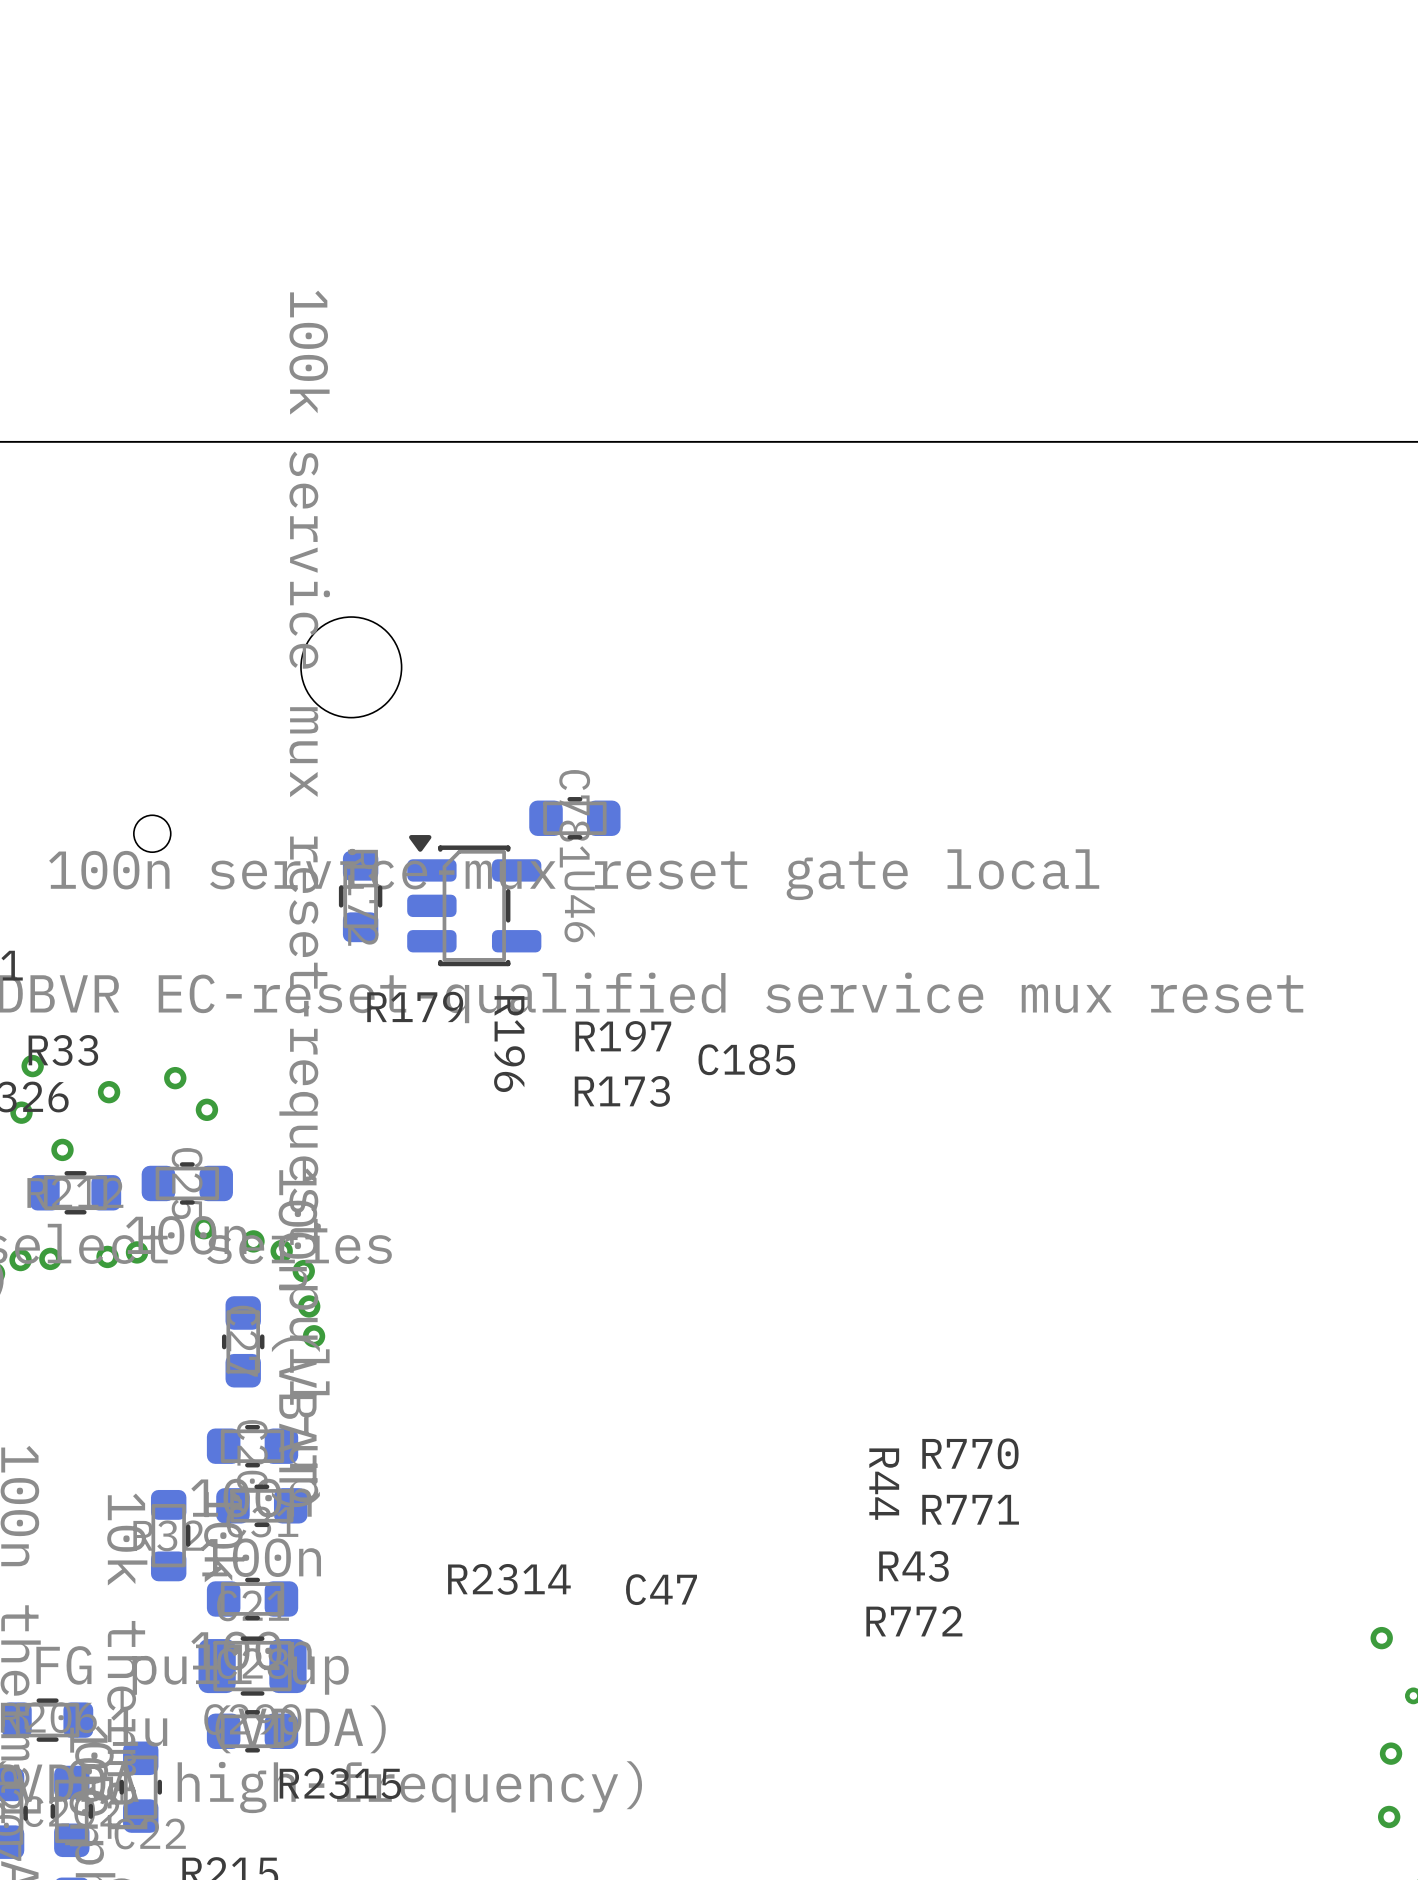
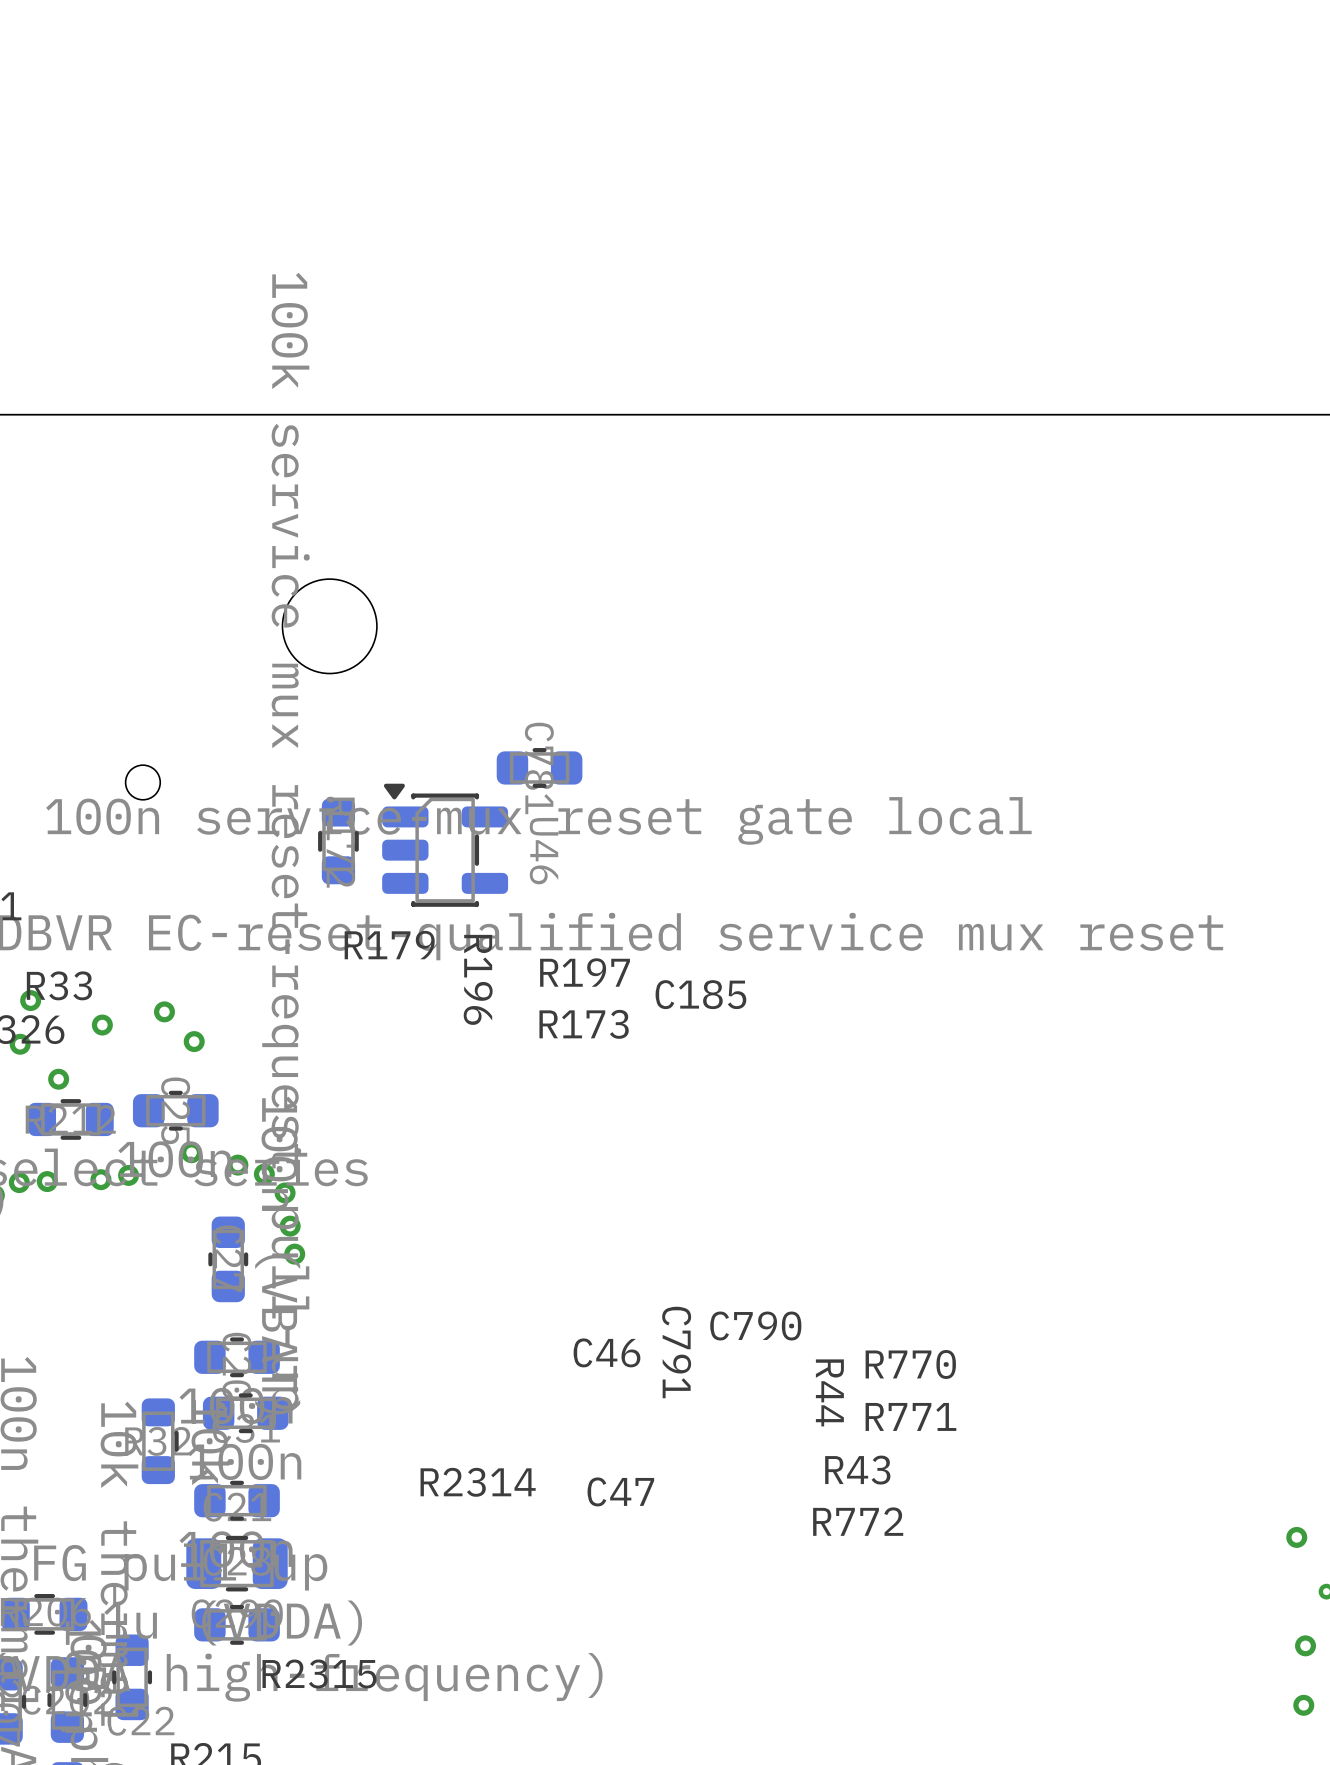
C790: none -> (755, 1326)
C46: none -> (606, 1352)
C791: none -> (676, 1352)

